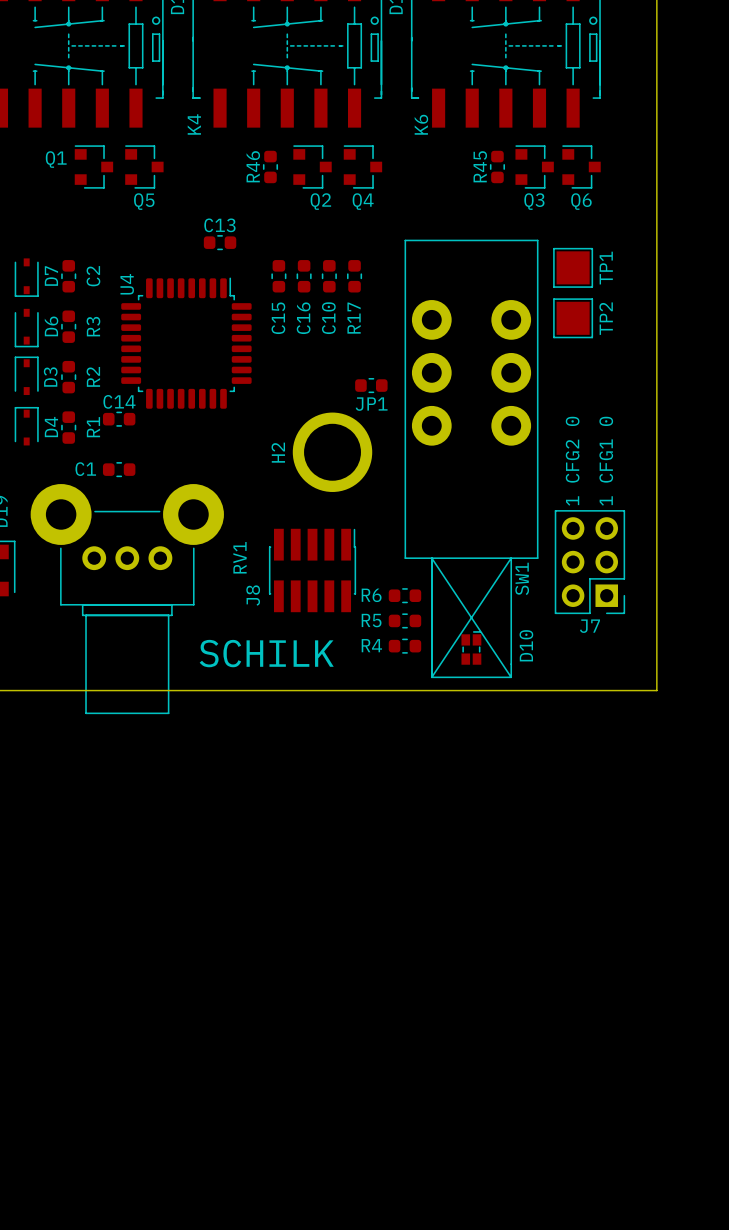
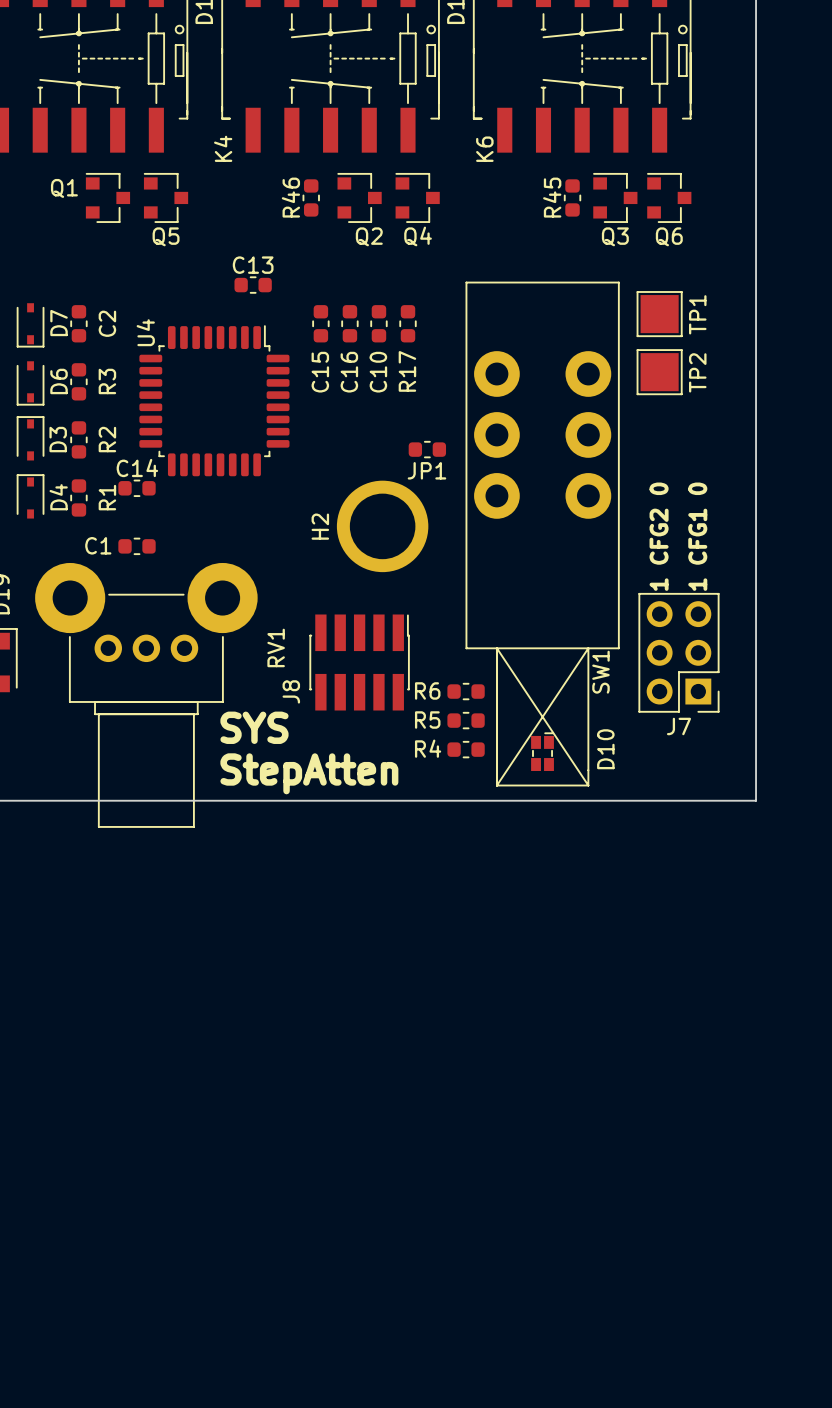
text: none -> SYS (254, 727)
text: SCHILK (266, 653) -> none
text: none -> StepAtten (309, 773)

